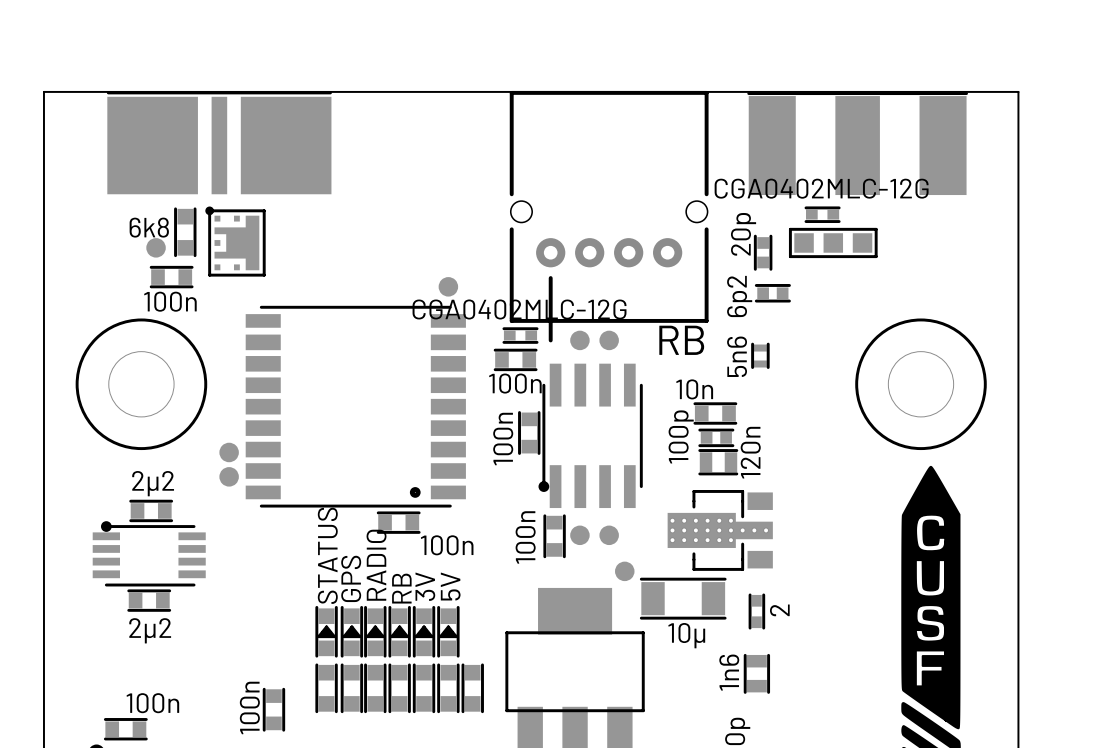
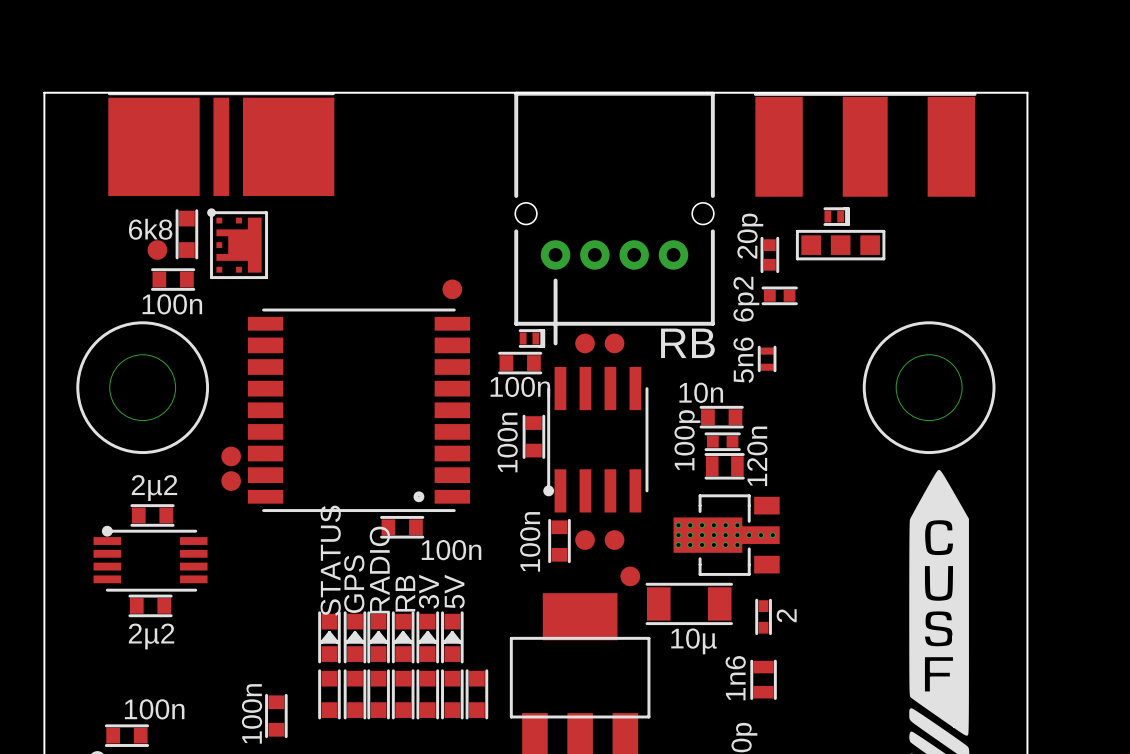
part value: CGA0402MLC-12G (821, 188) -> none
part footprint: [804, 206, 841, 224] -> [823, 207, 850, 226]
part value: CGA0402MLC-12G (519, 309) -> none
part footprint: [502, 327, 539, 344] -> [518, 329, 546, 348]

